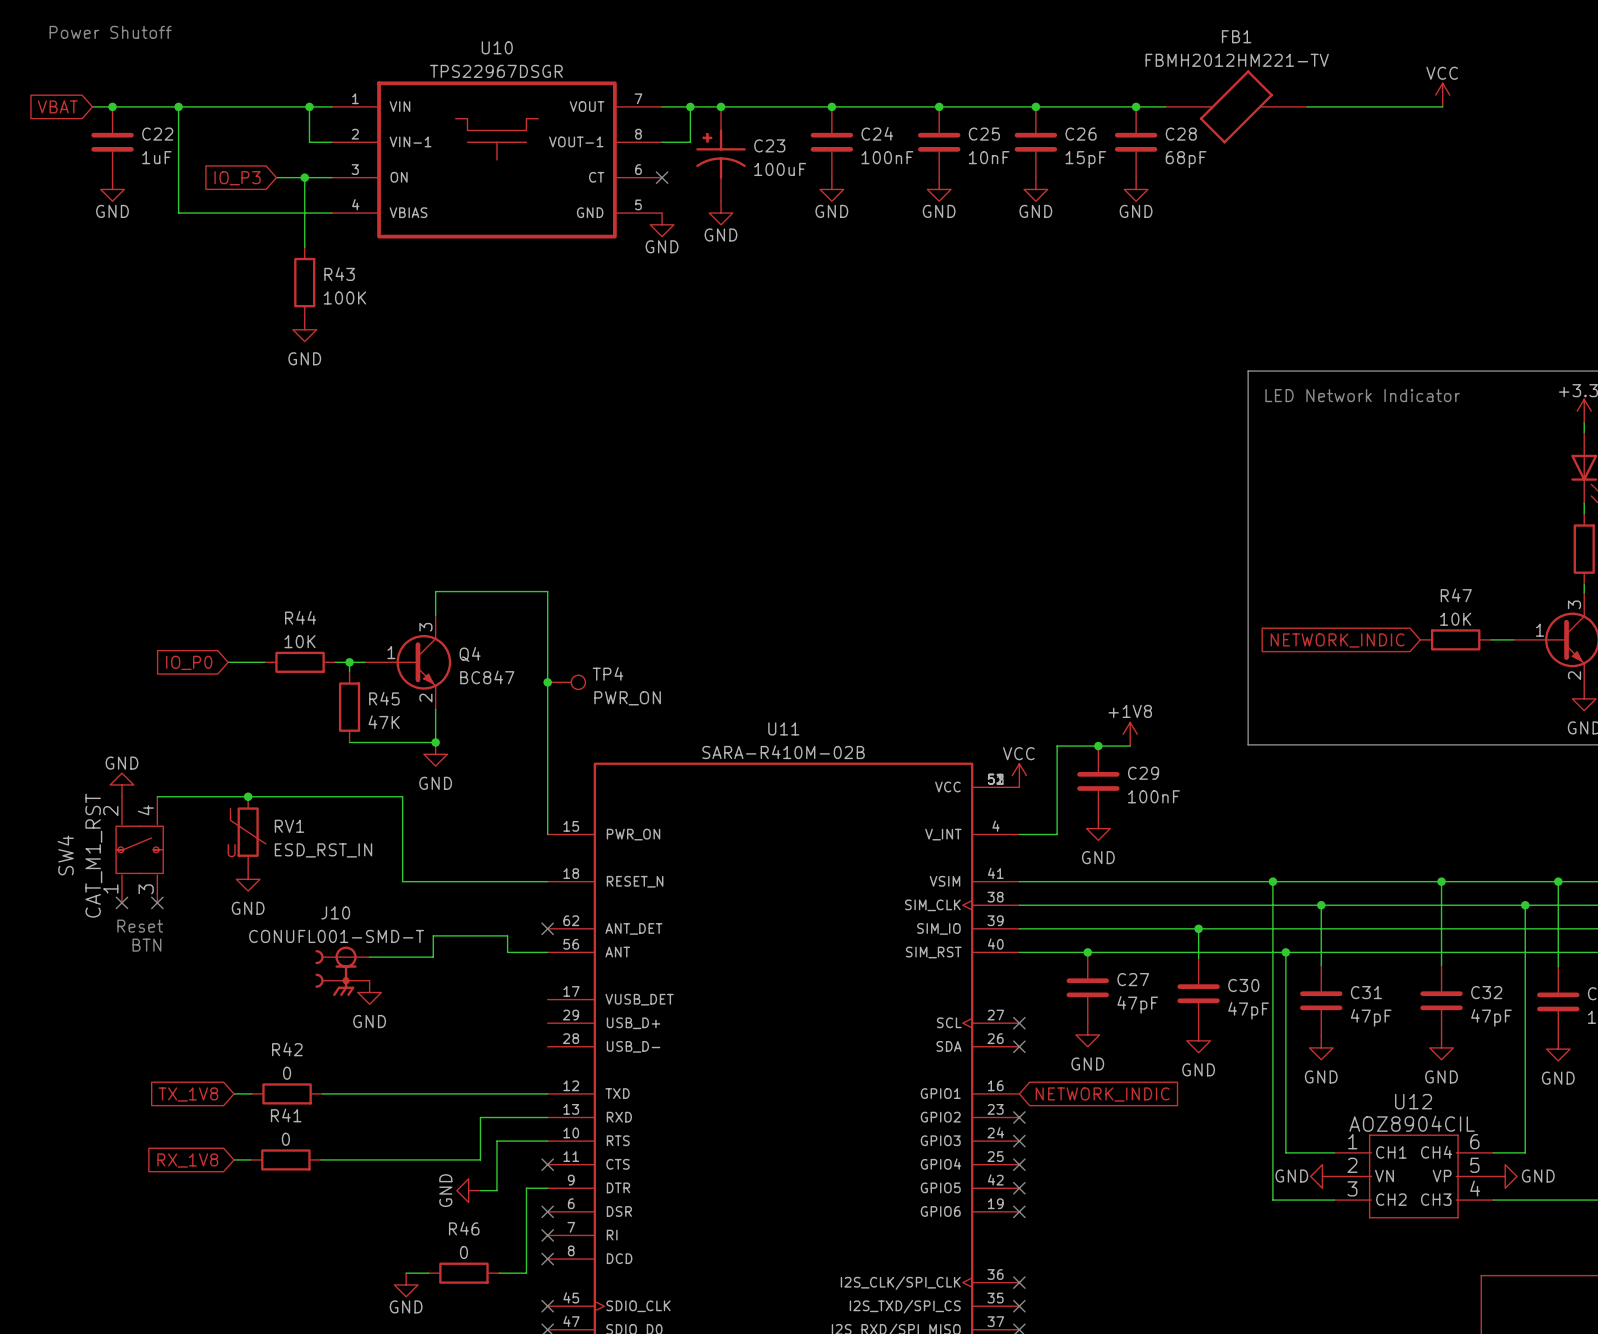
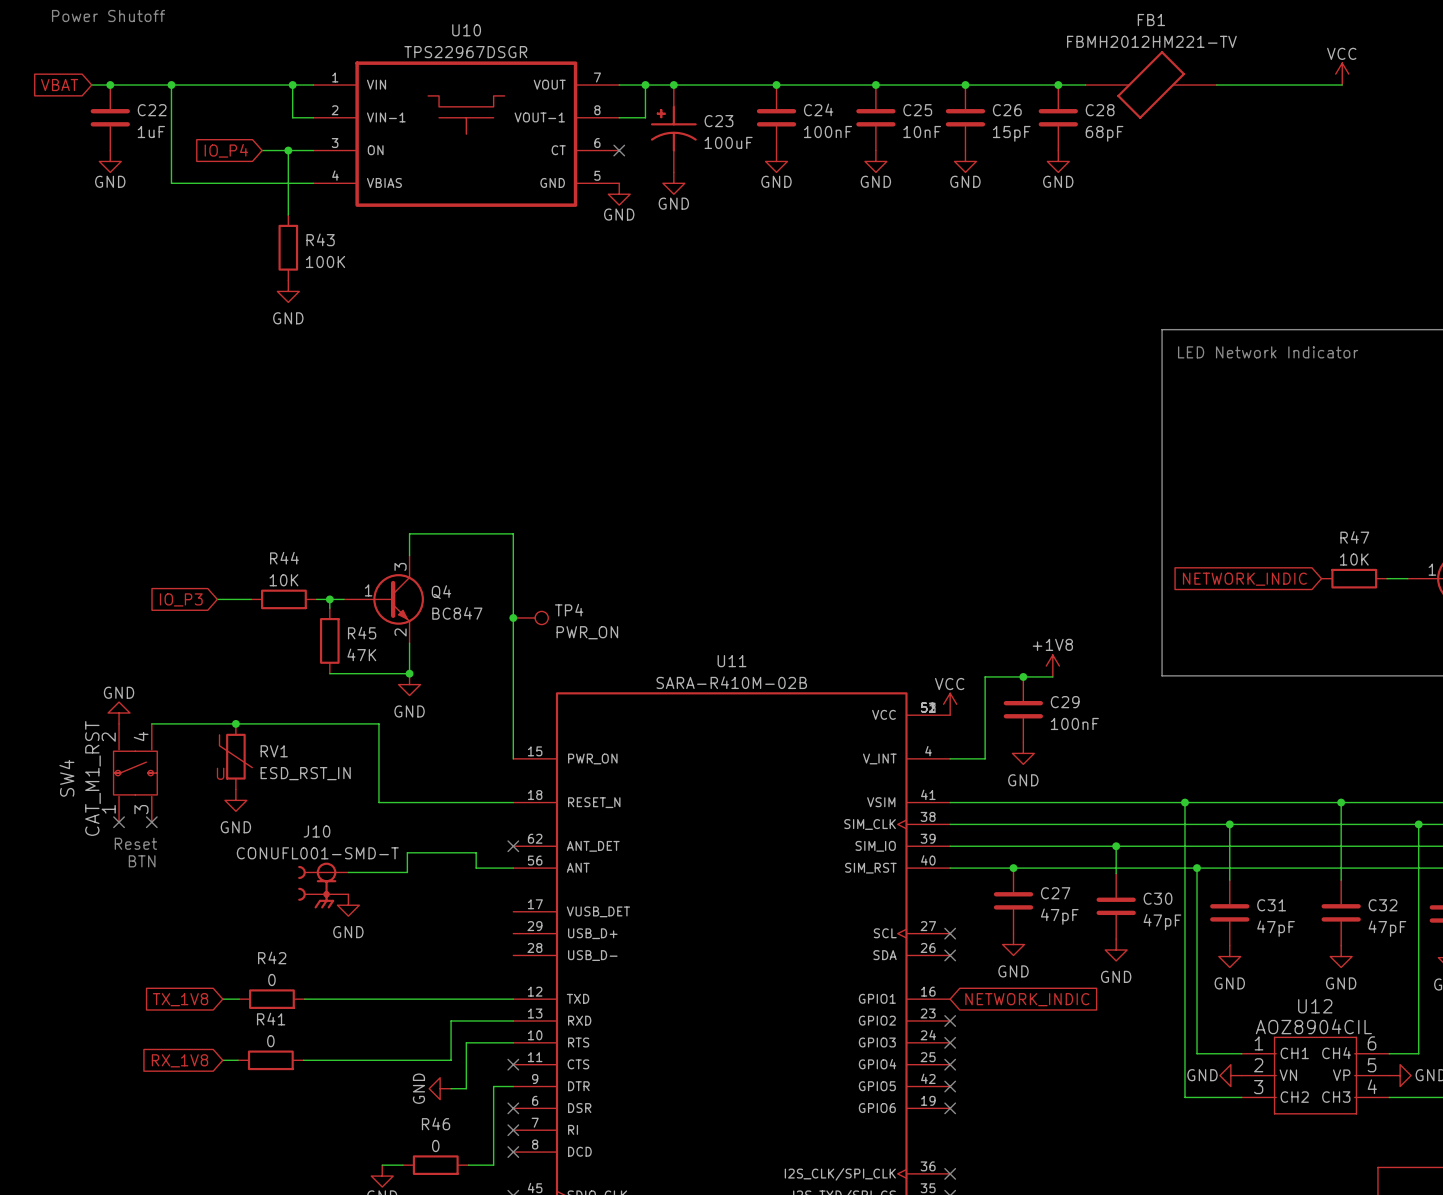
global label: IO_P3 (237, 178) -> IO_P4 (226, 150)
global label: IO_P0 (189, 662) -> IO_P3 (181, 599)

